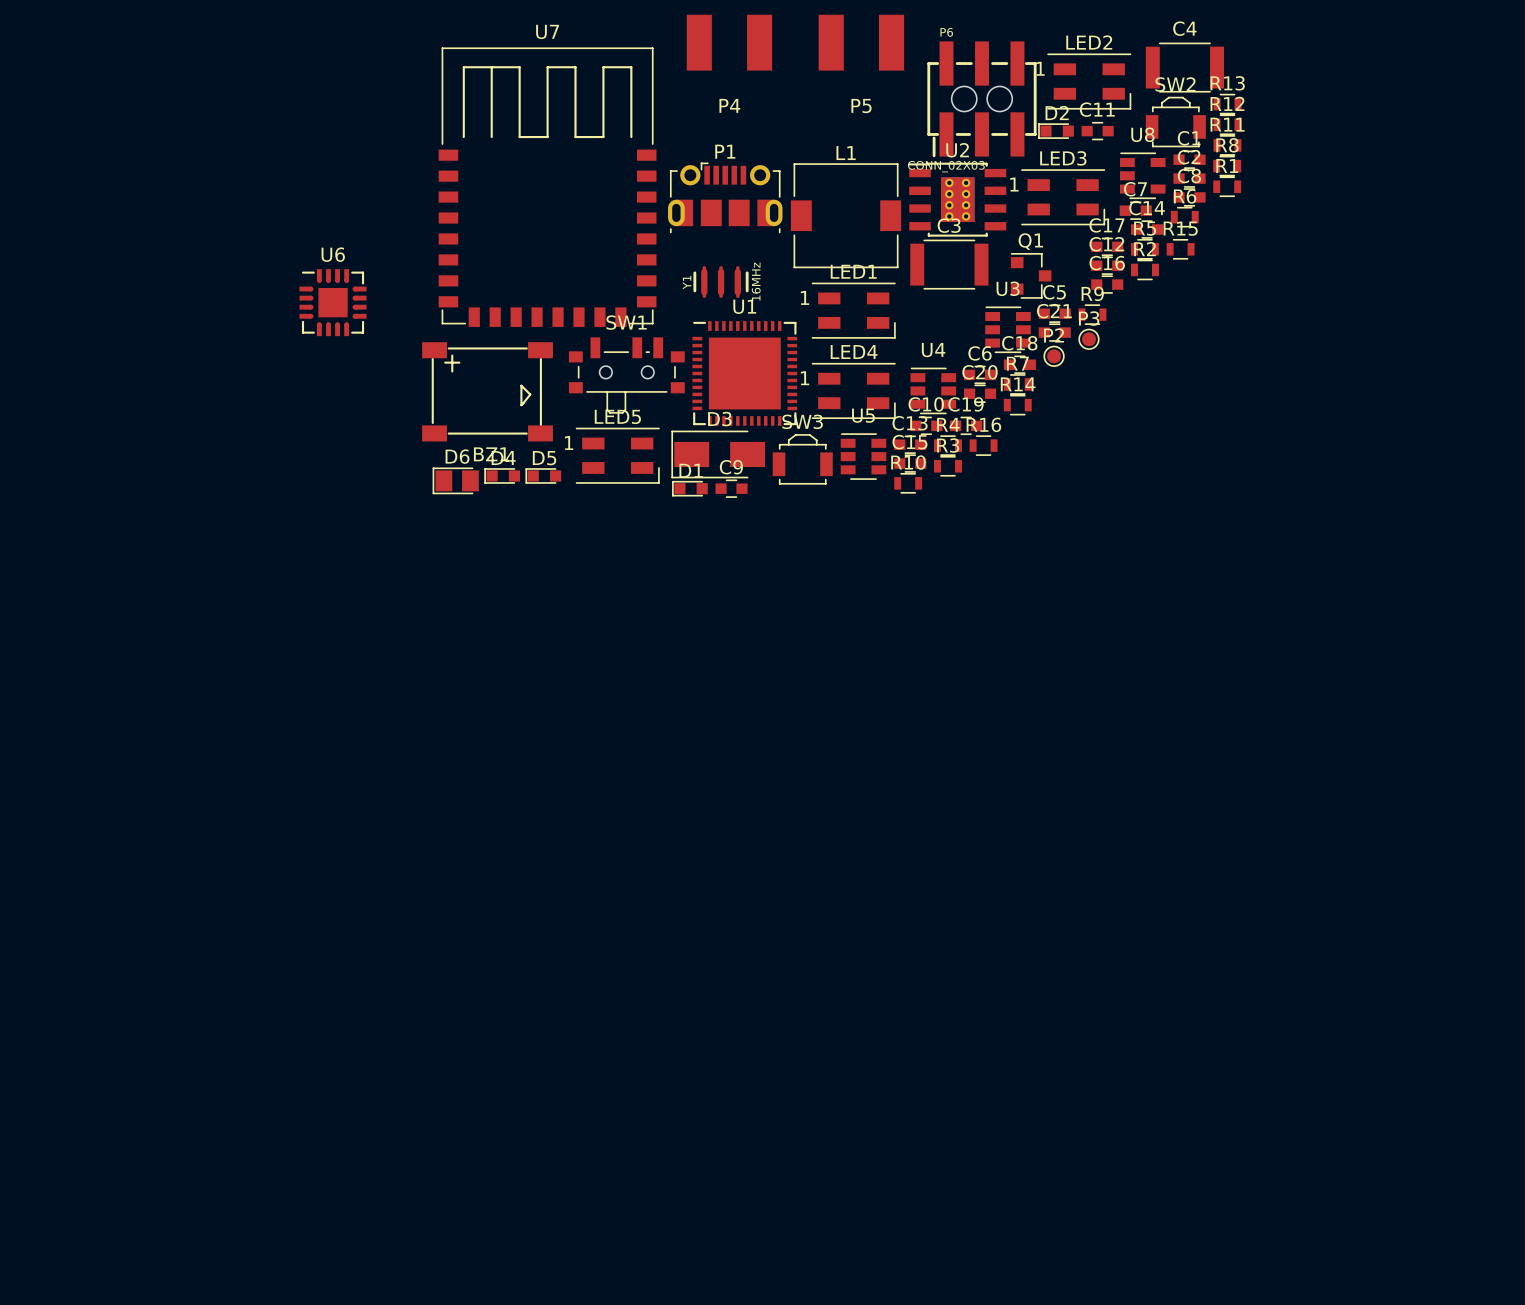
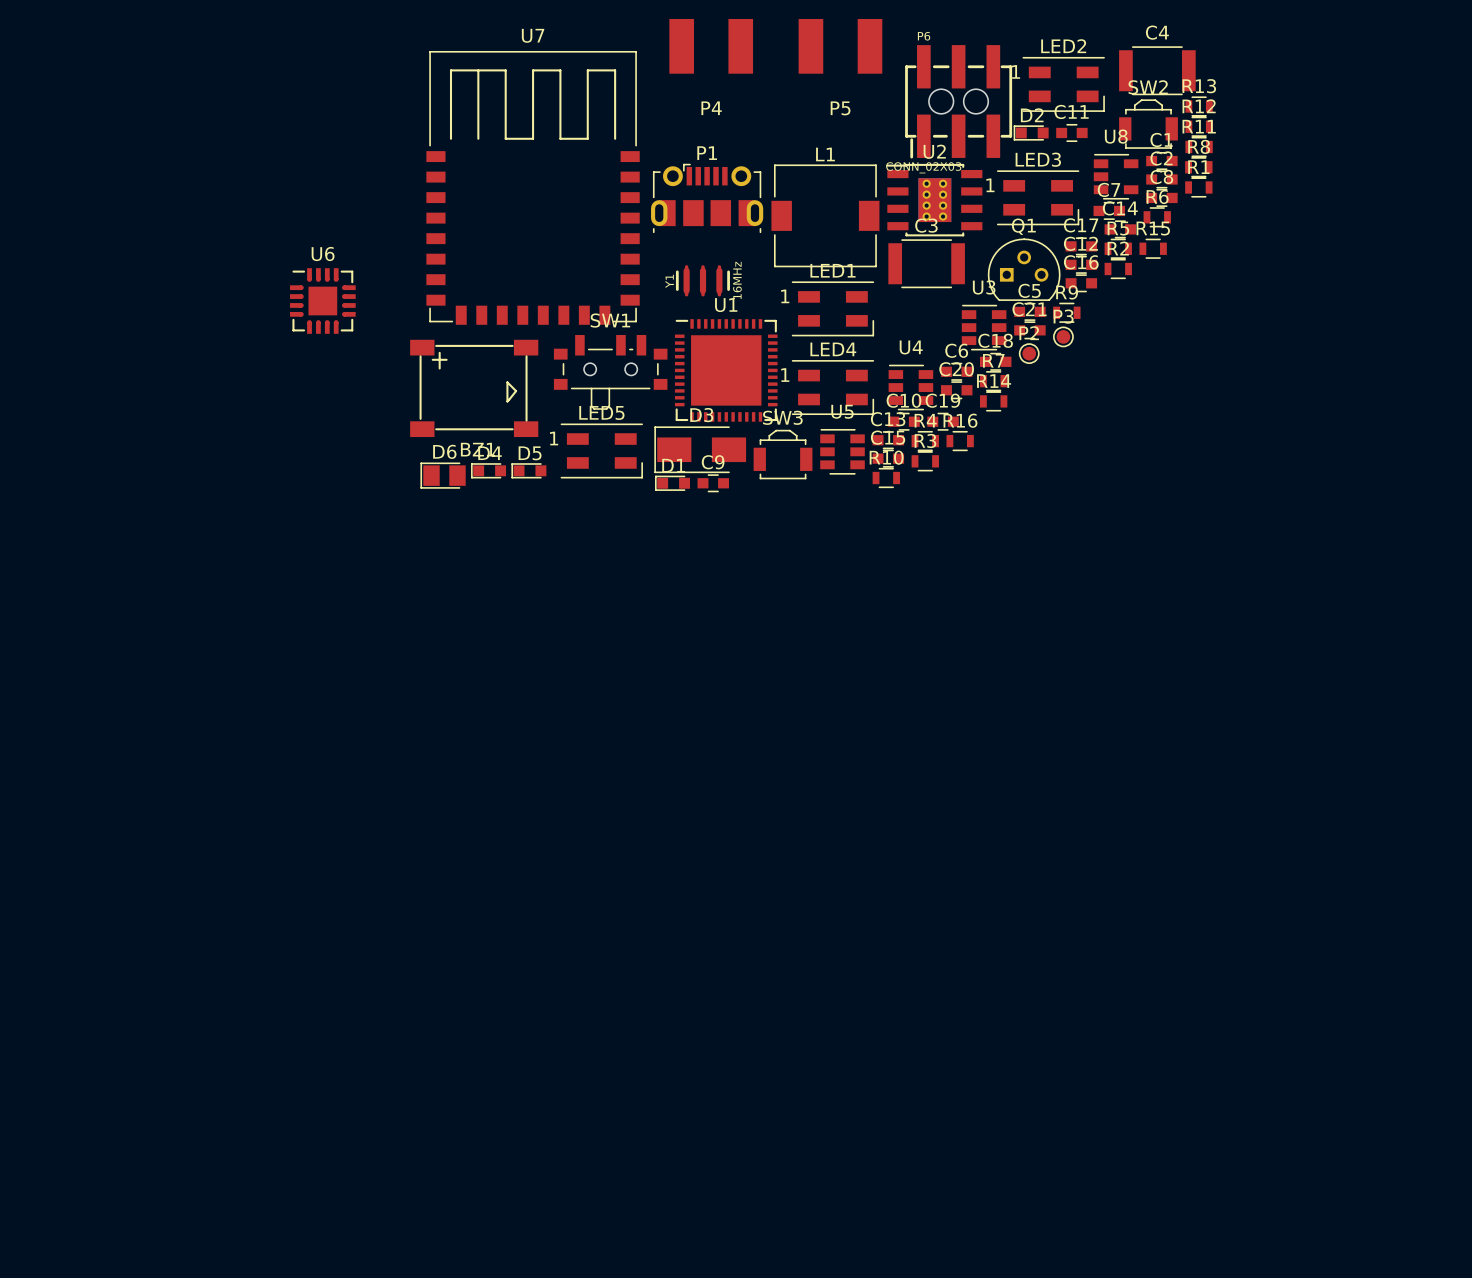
Q1 footprint: [1010, 253, 1052, 299] -> [987, 238, 1061, 301]

